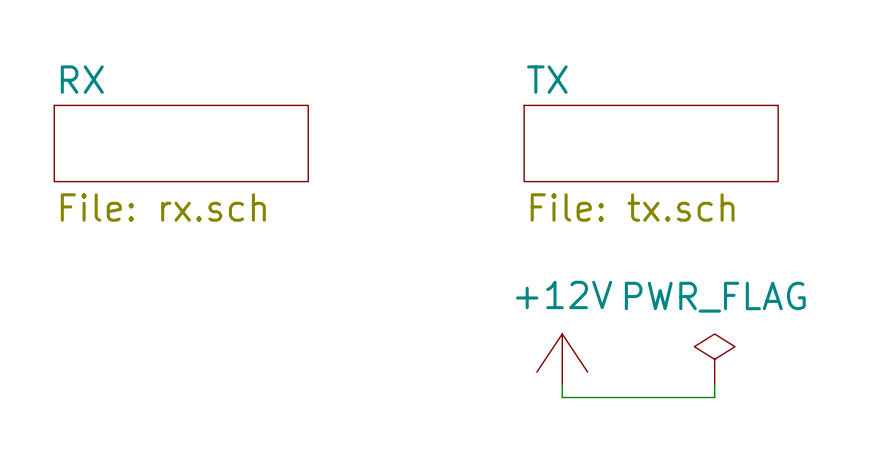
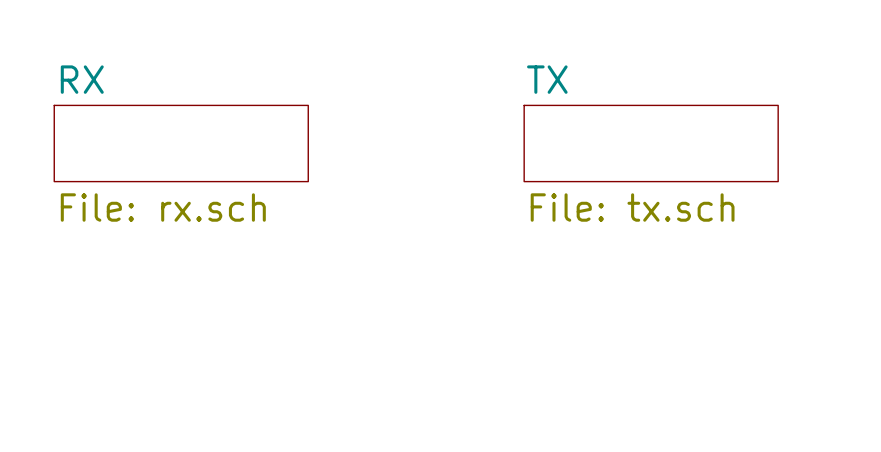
power symbol: +12V (562, 359) -> none
power symbol: PWR_FLAG (714, 359) -> none
wire: (562, 384) (562, 397) (714, 397) (714, 384) -> none

